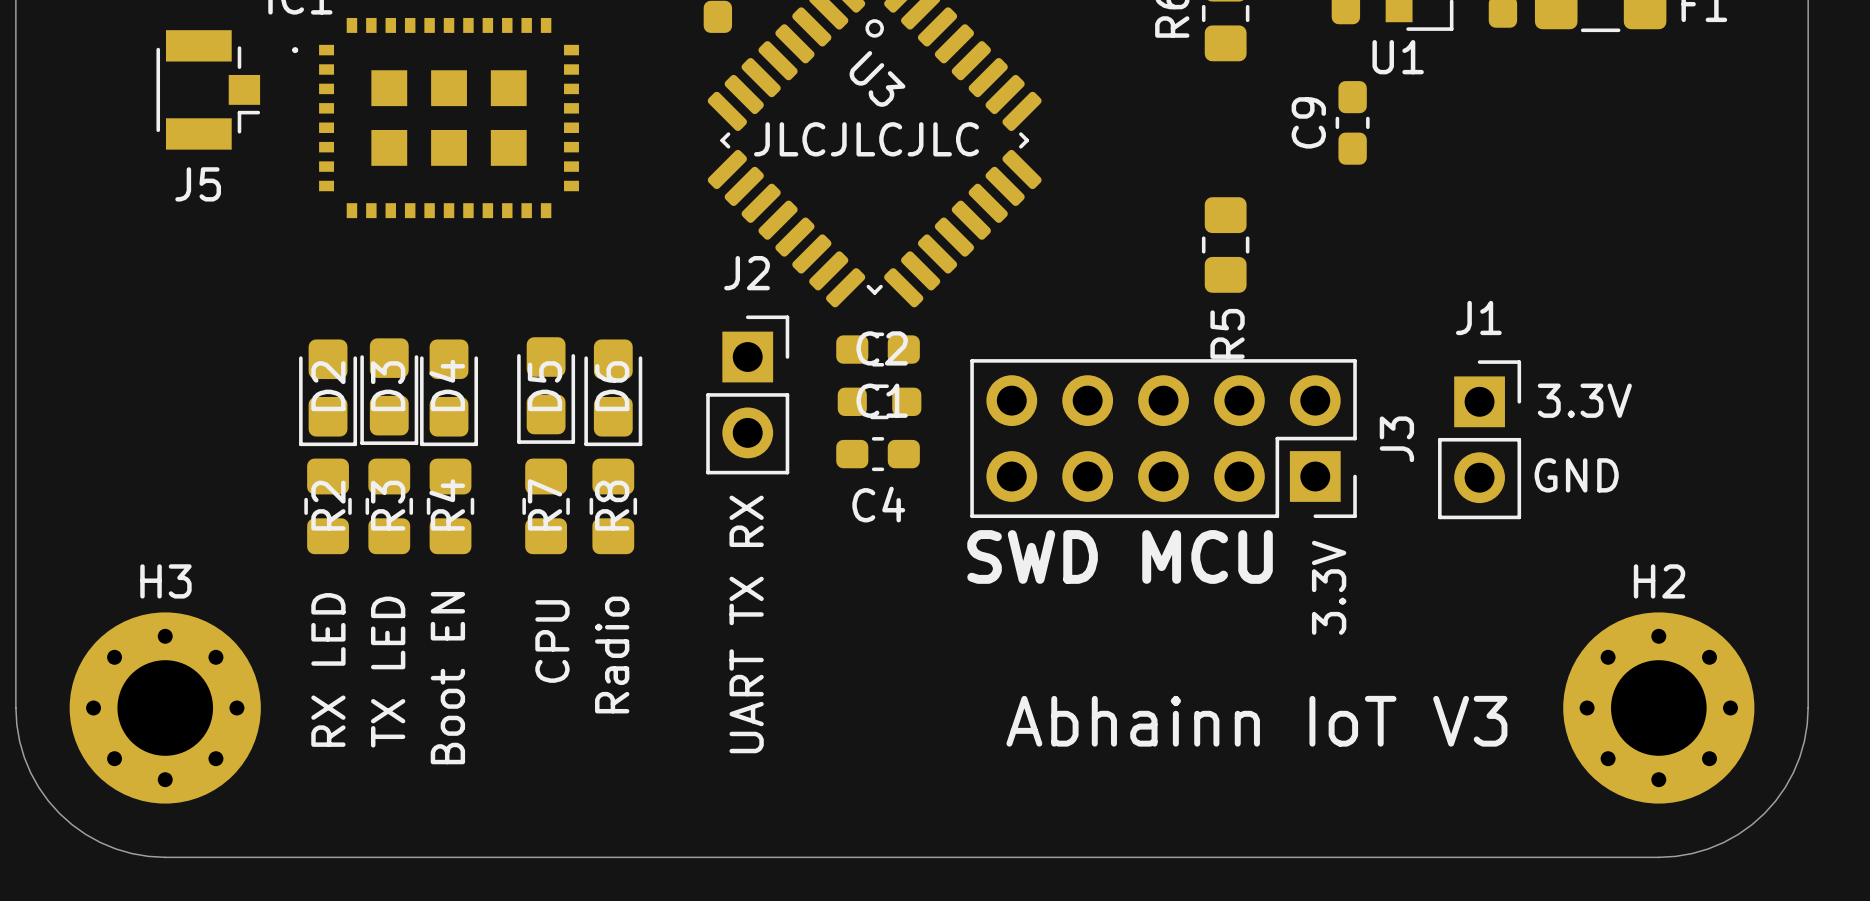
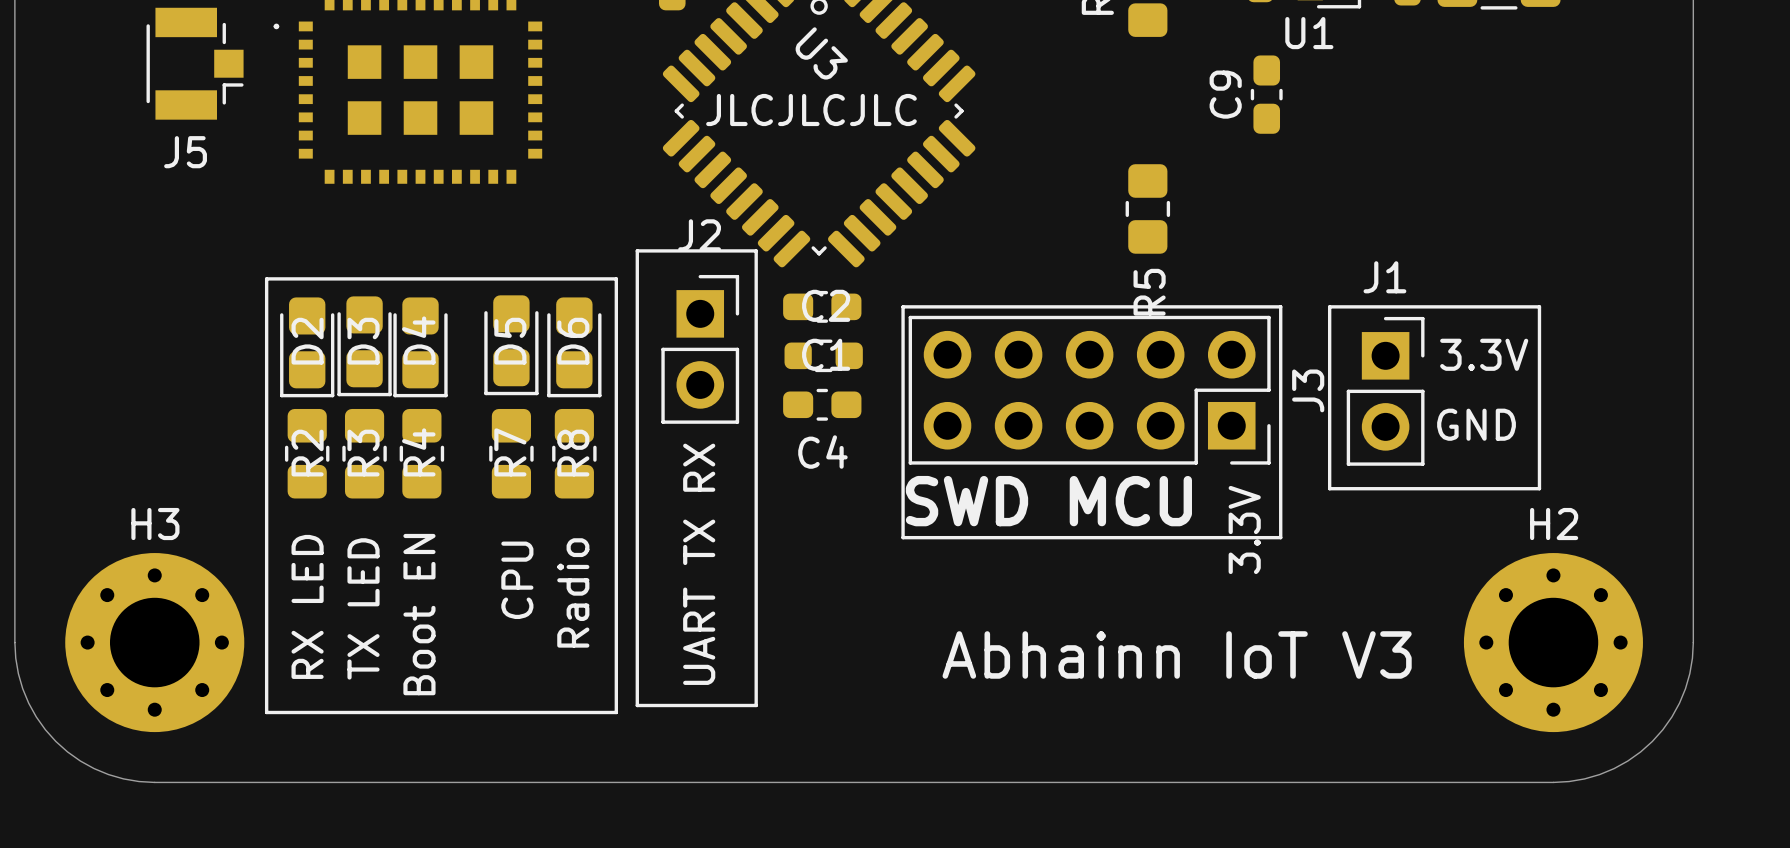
line: none -> (637, 250) (756, 250) (756, 705) (637, 705) (637, 250)
line: none -> (266, 278) (616, 278) (616, 712) (266, 712) (266, 278)
line: none -> (903, 306) (1280, 306) (1280, 537) (903, 537) (903, 306)
line: none -> (1329, 306) (1539, 306) (1539, 488) (1329, 488) (1329, 306)

